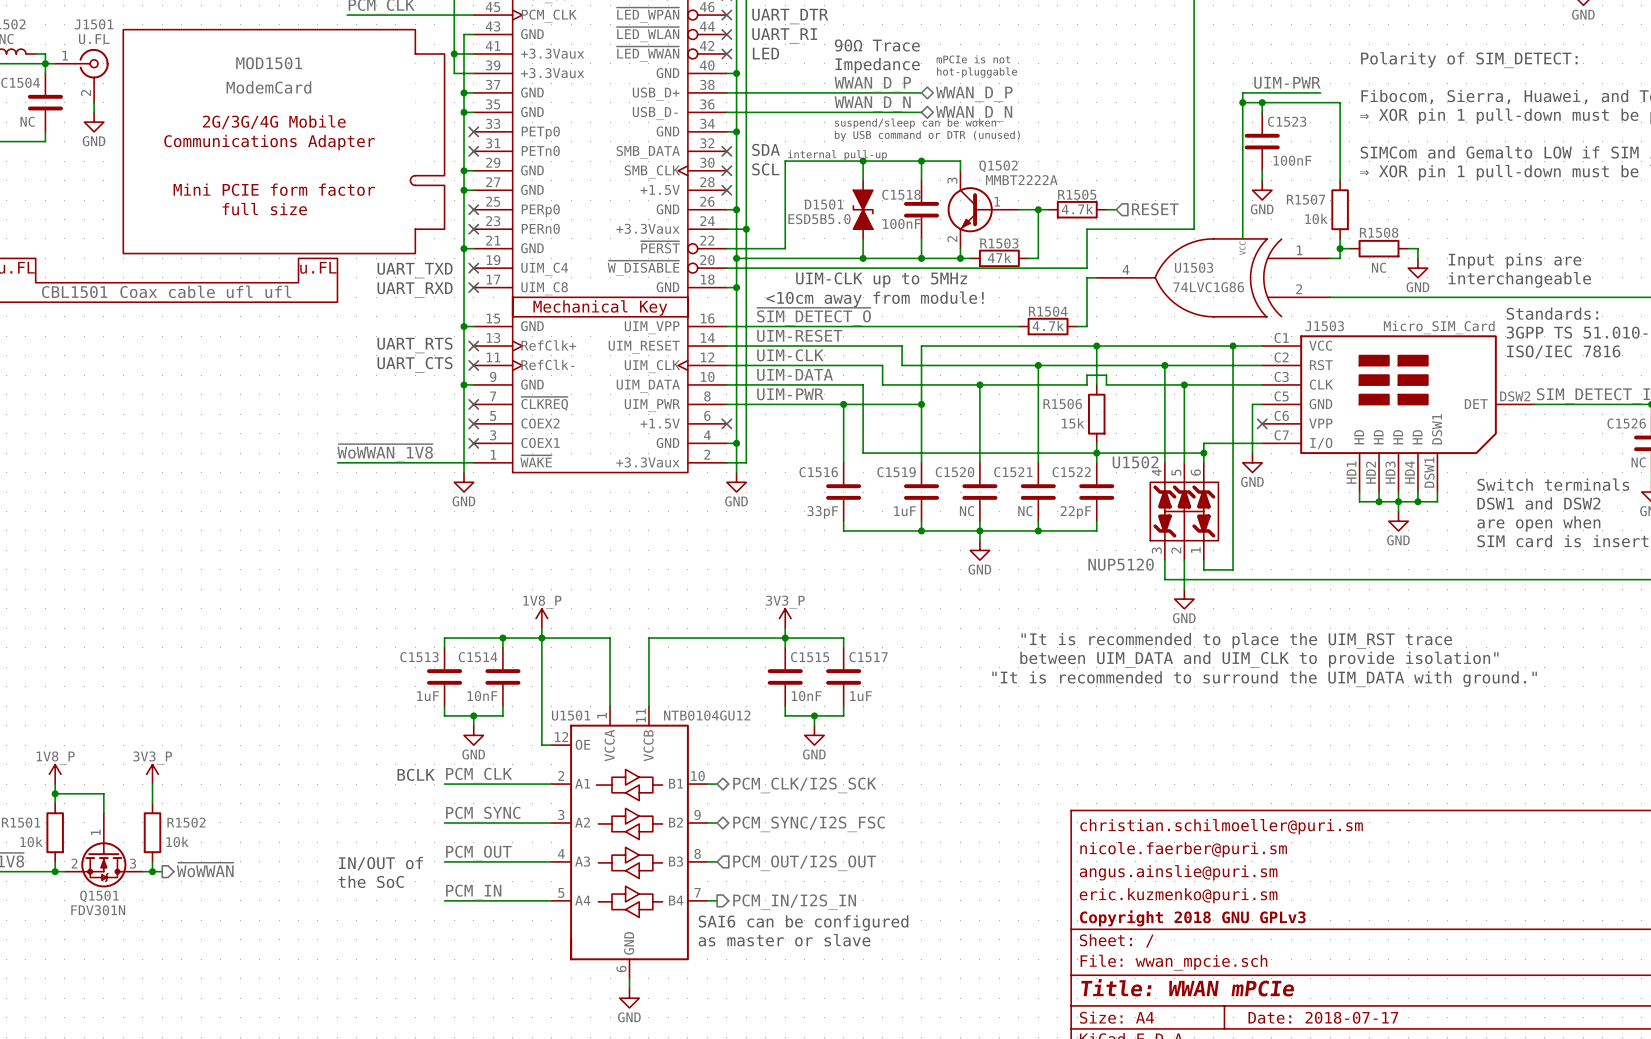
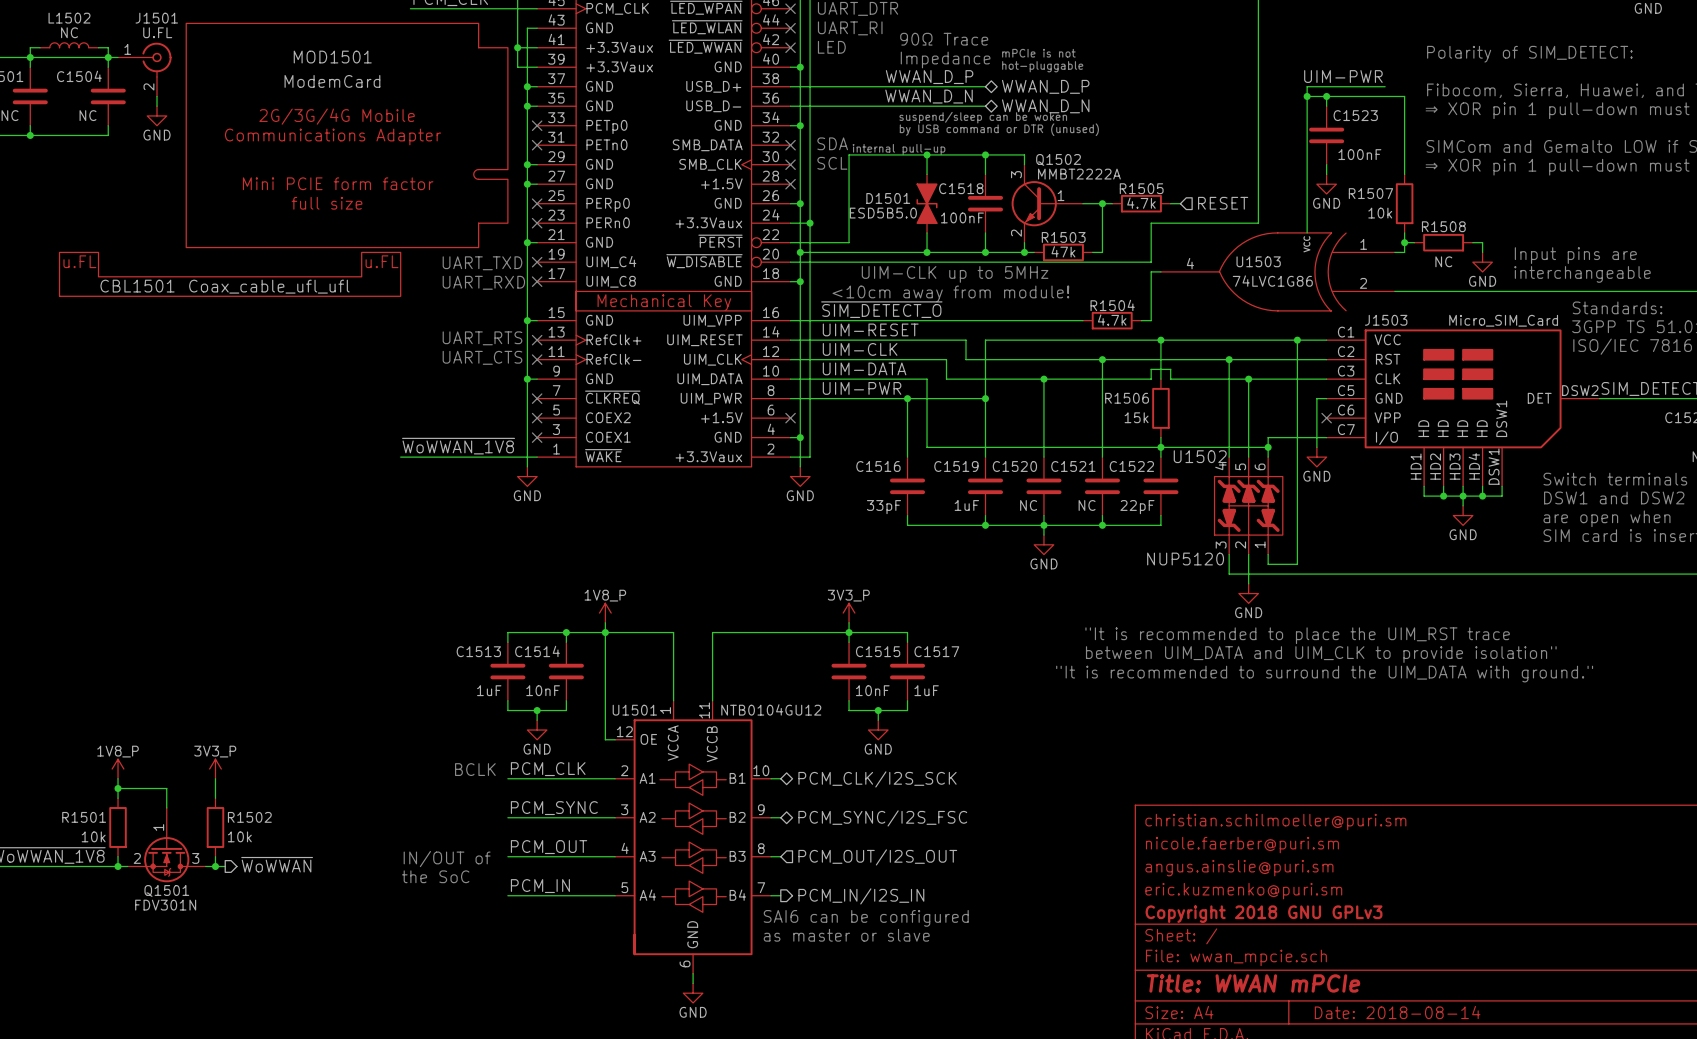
title block: Date: 2018-07-17 (1323, 1017) -> Date: 2018-08-14 (1397, 1012)

